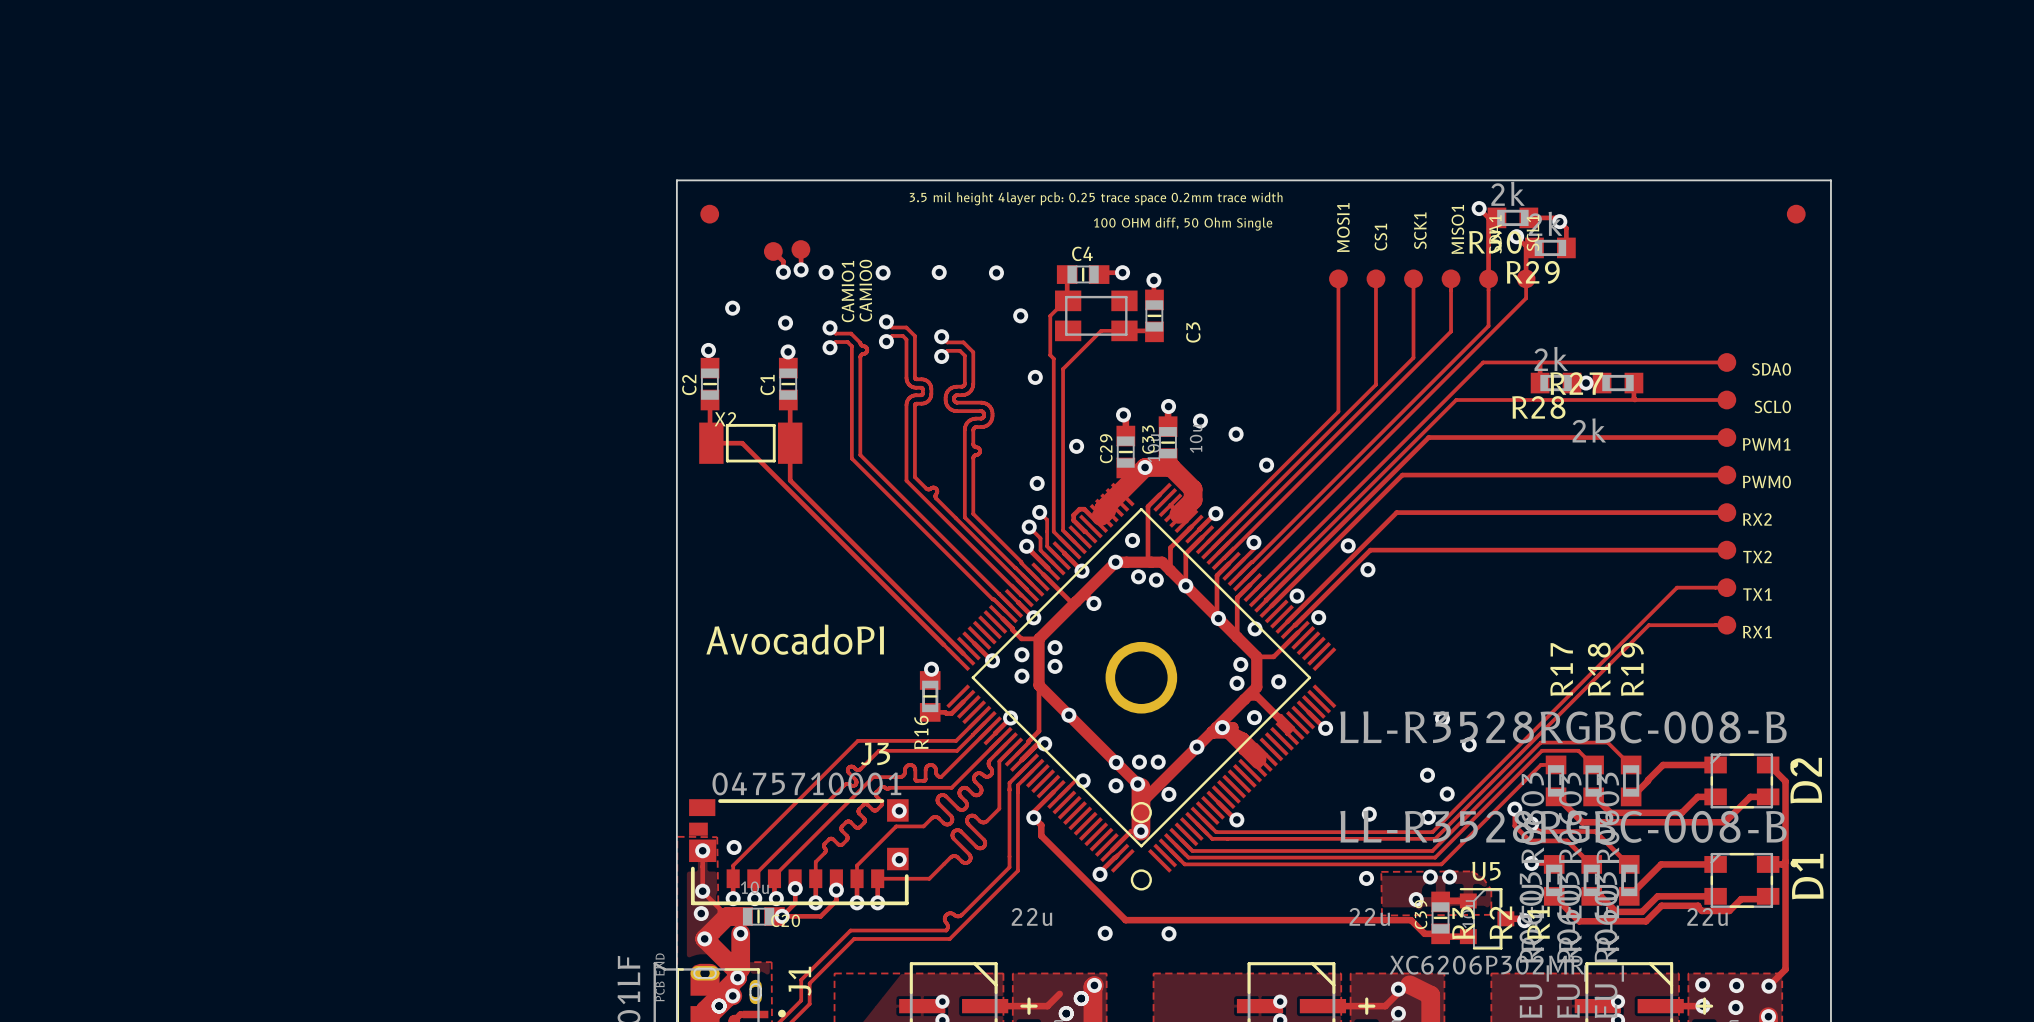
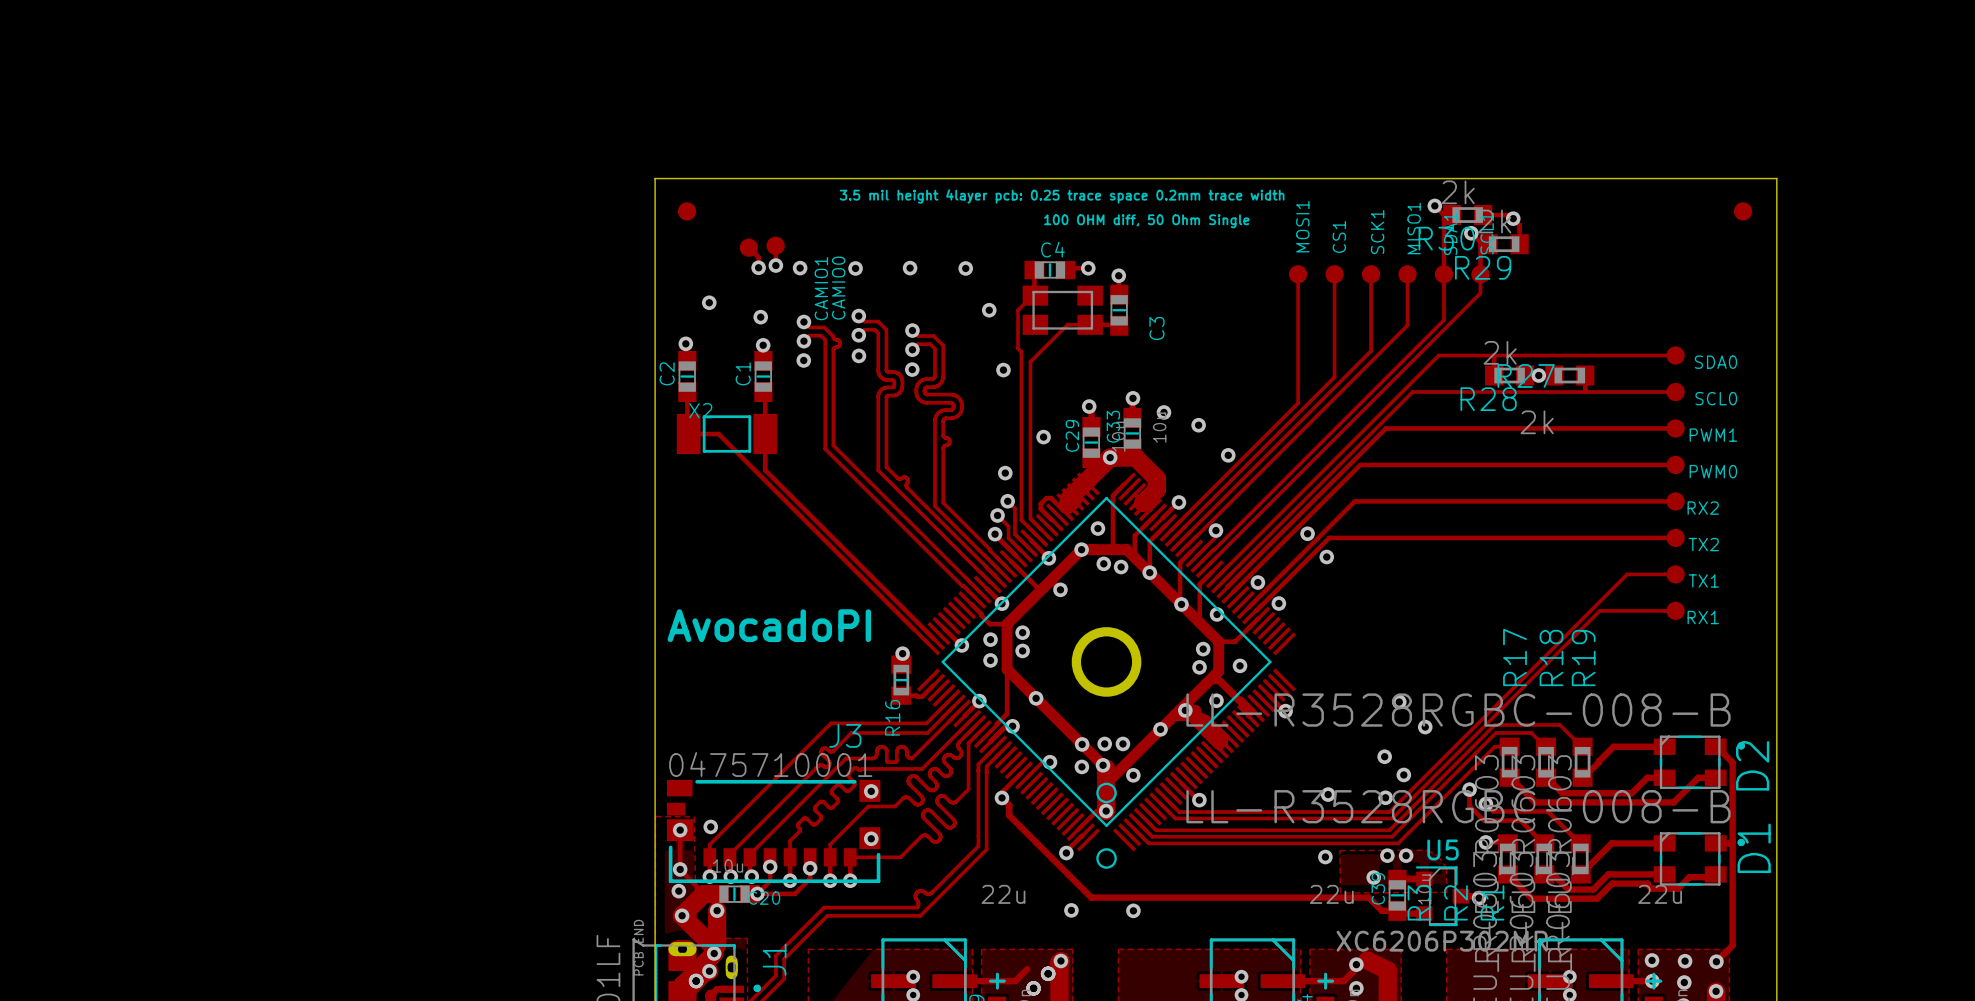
via: none -> (858, 355)
via: none -> (803, 360)
via: none -> (912, 369)

